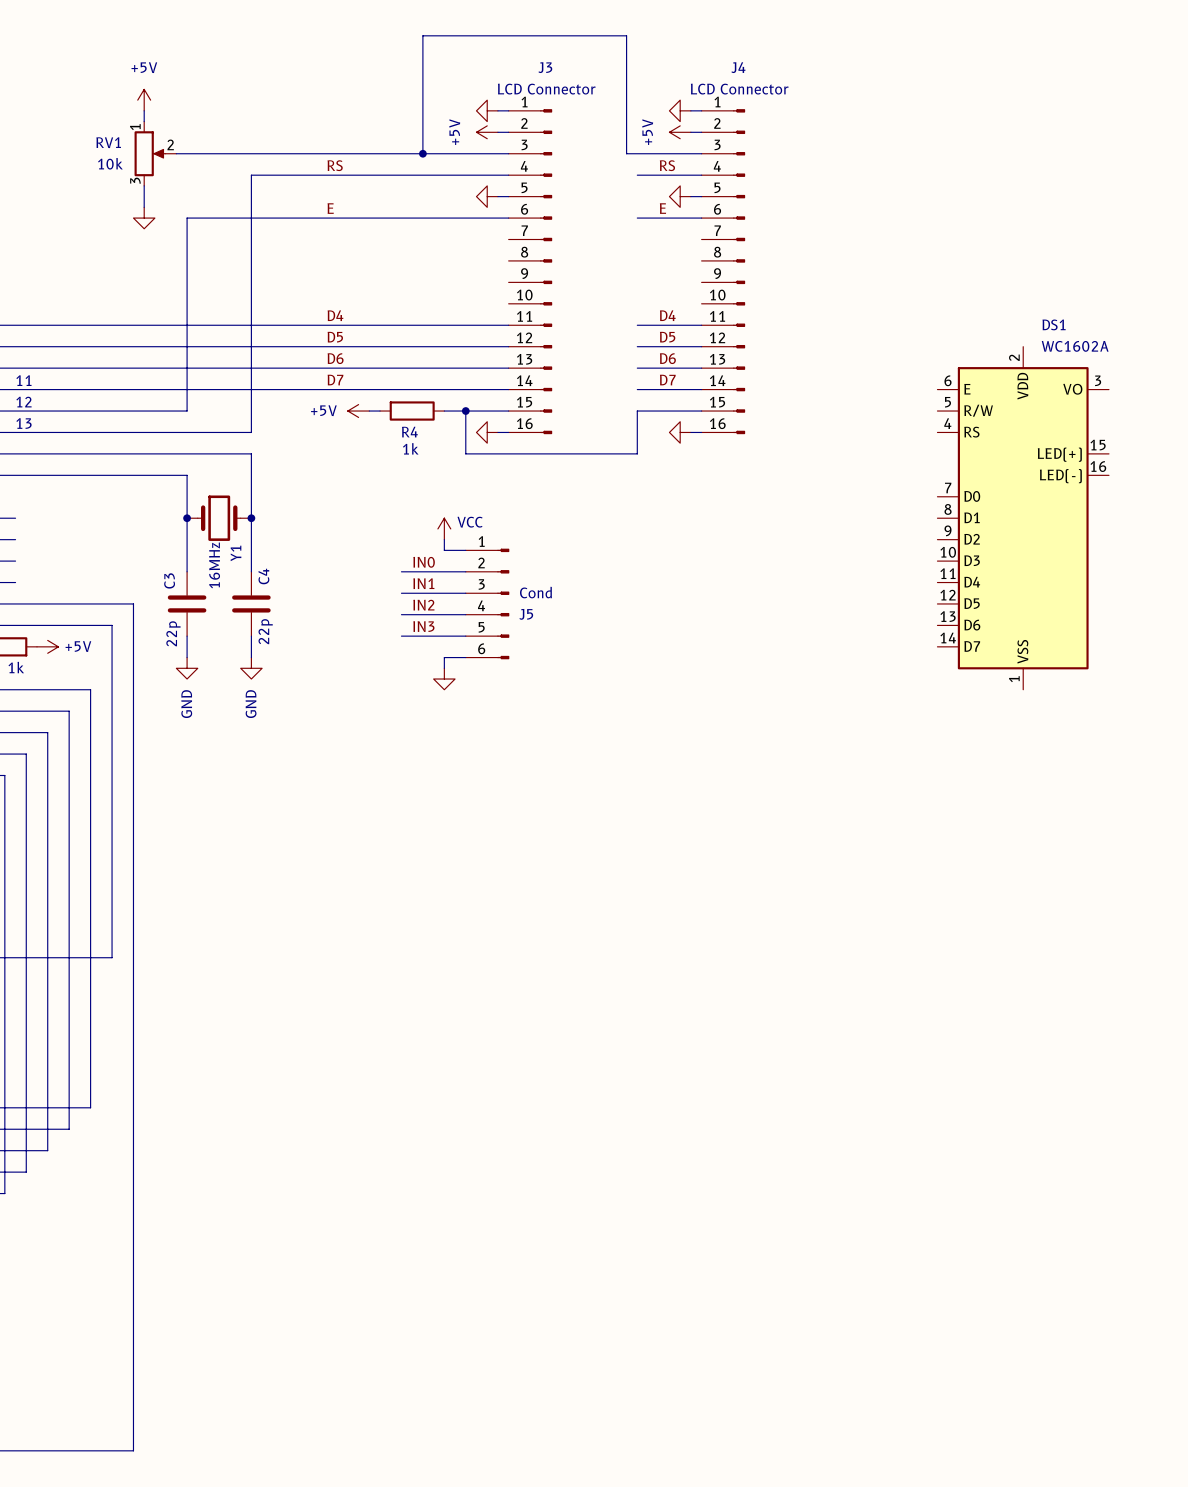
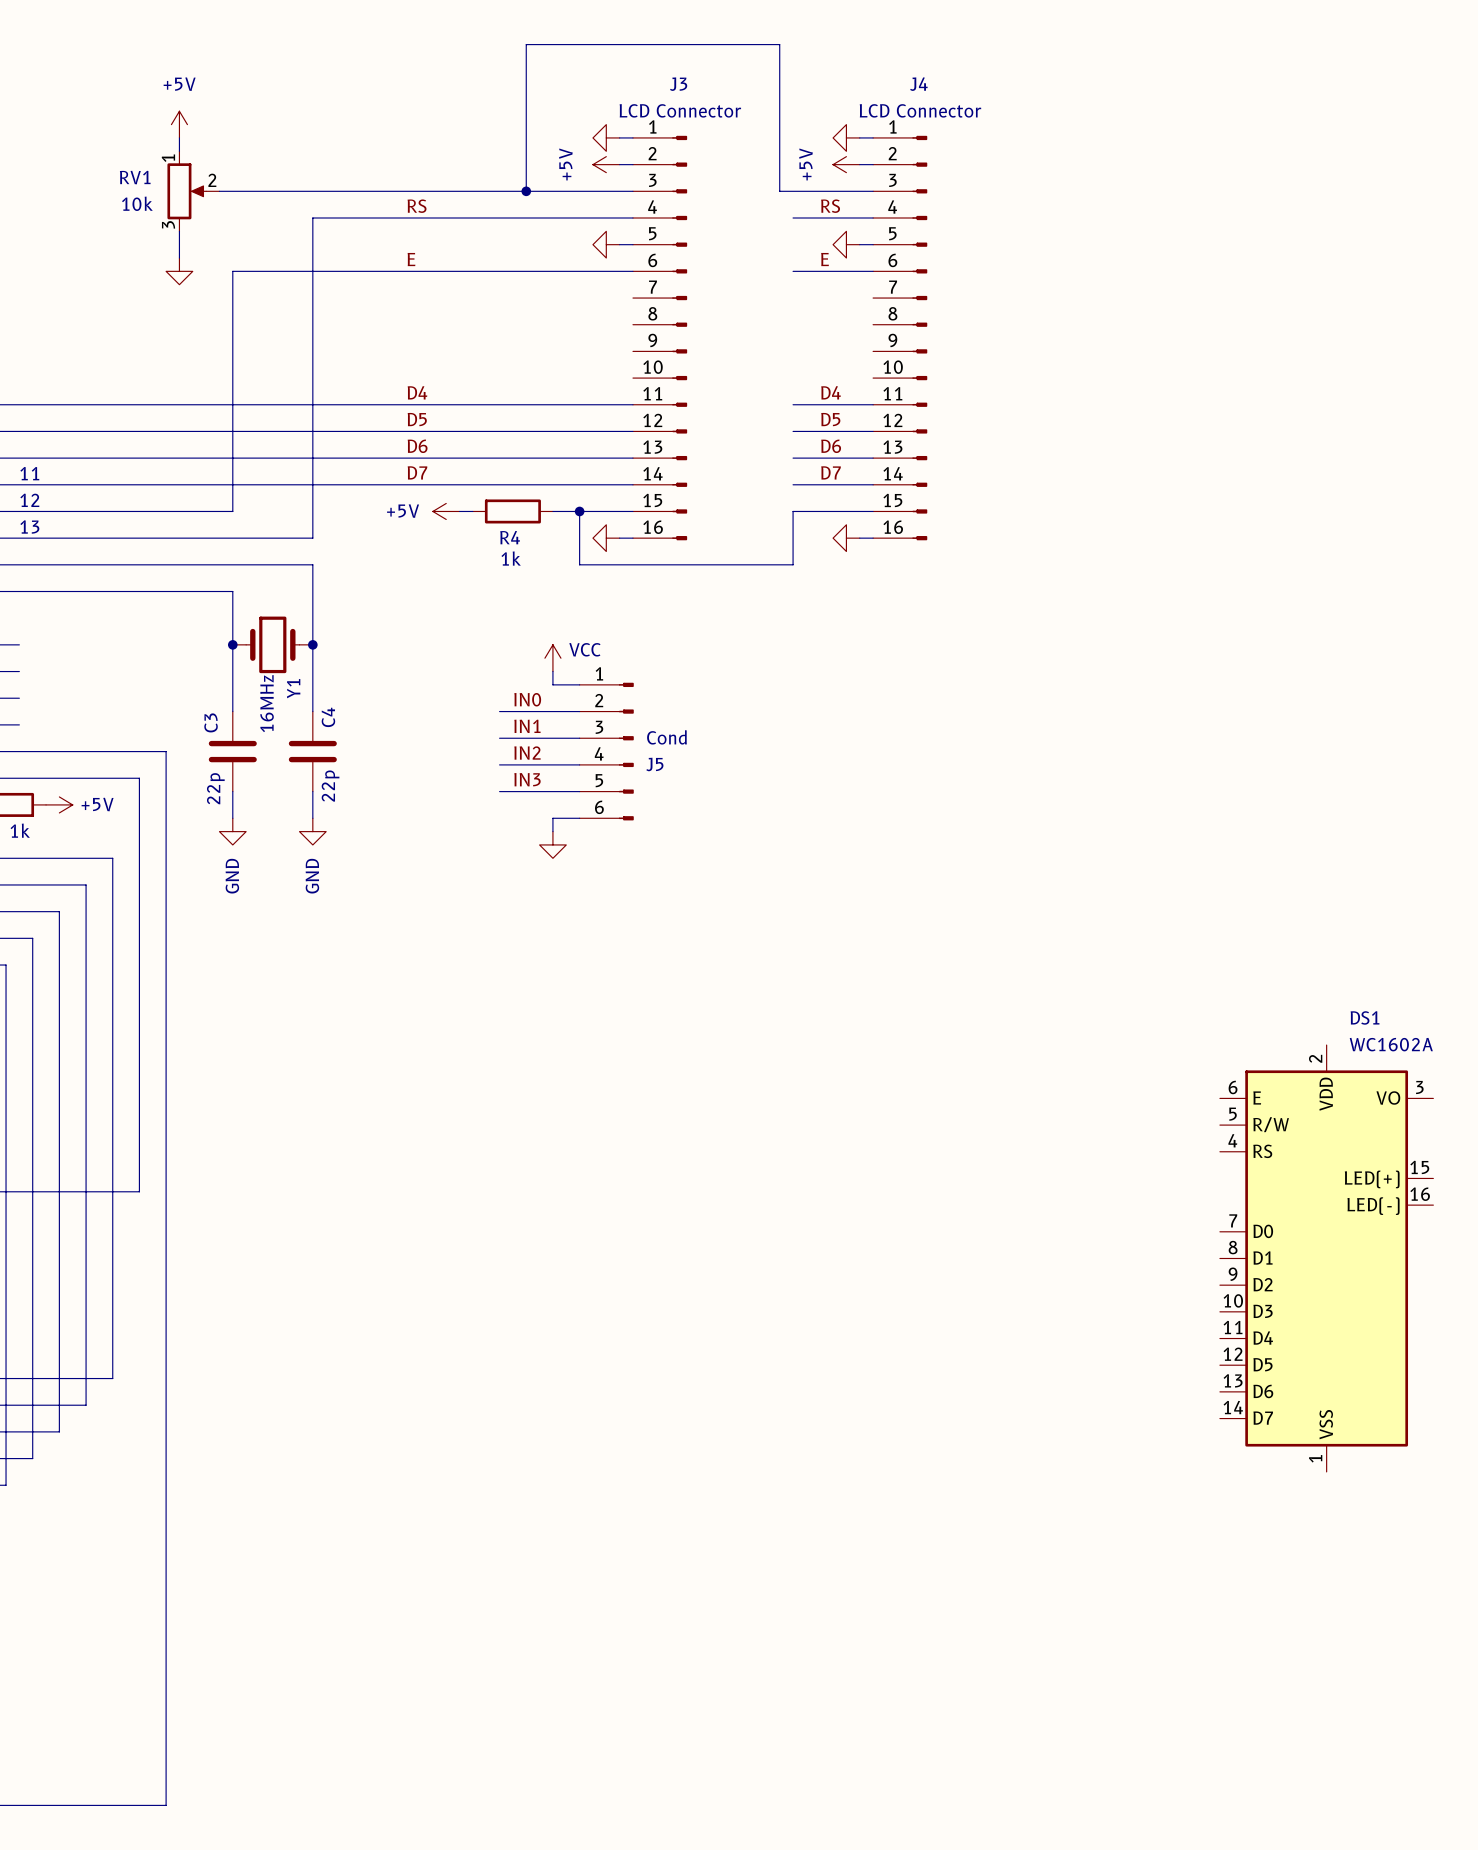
DS1 position: (1023, 518) -> (1326, 1258)

